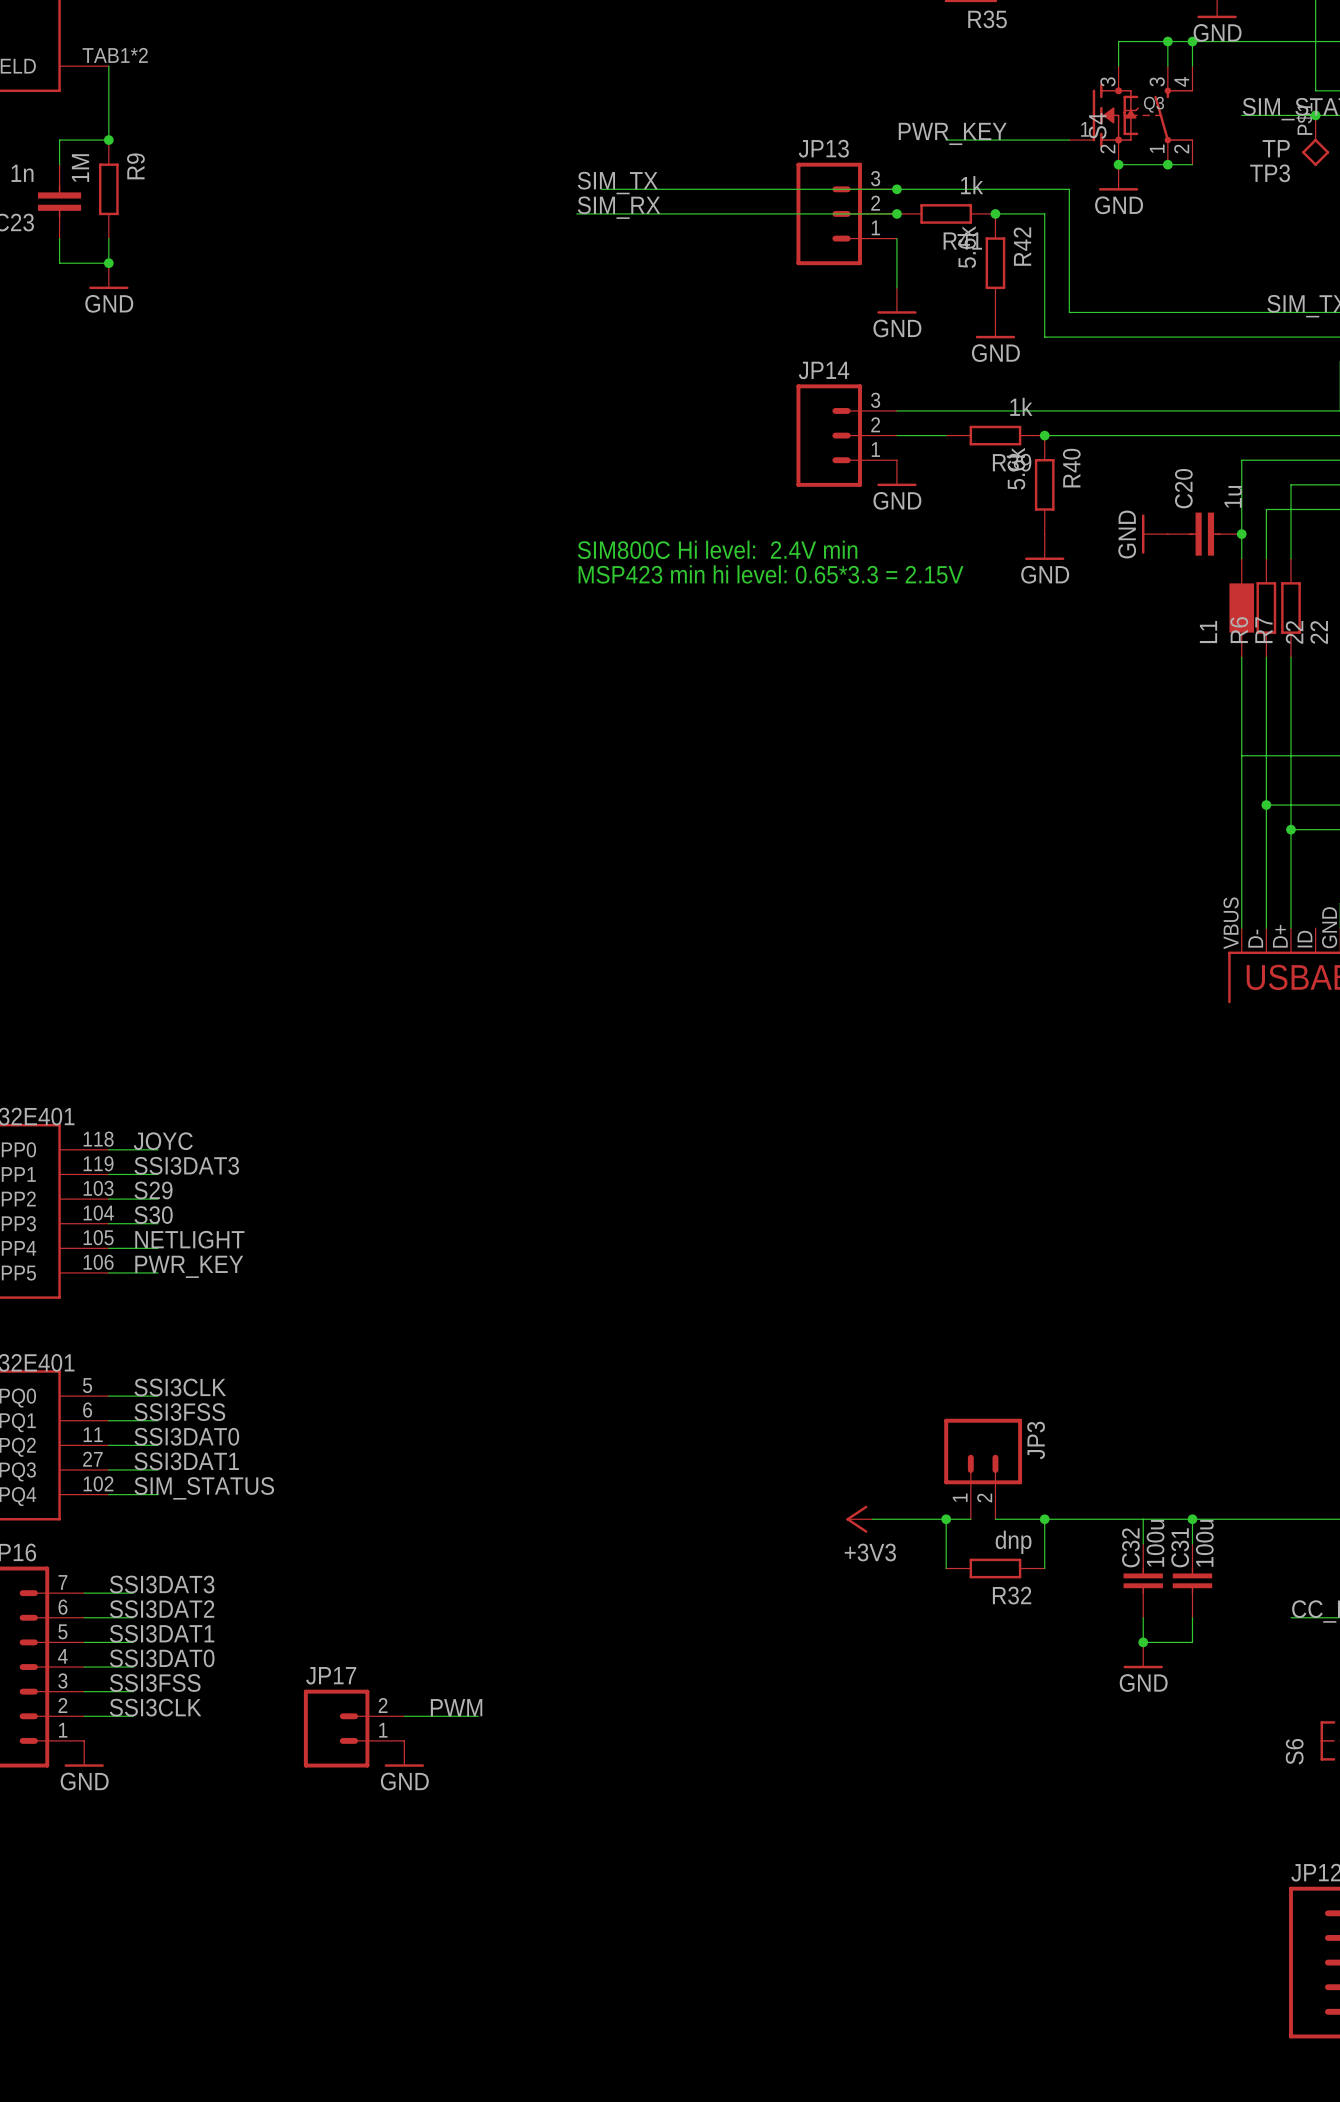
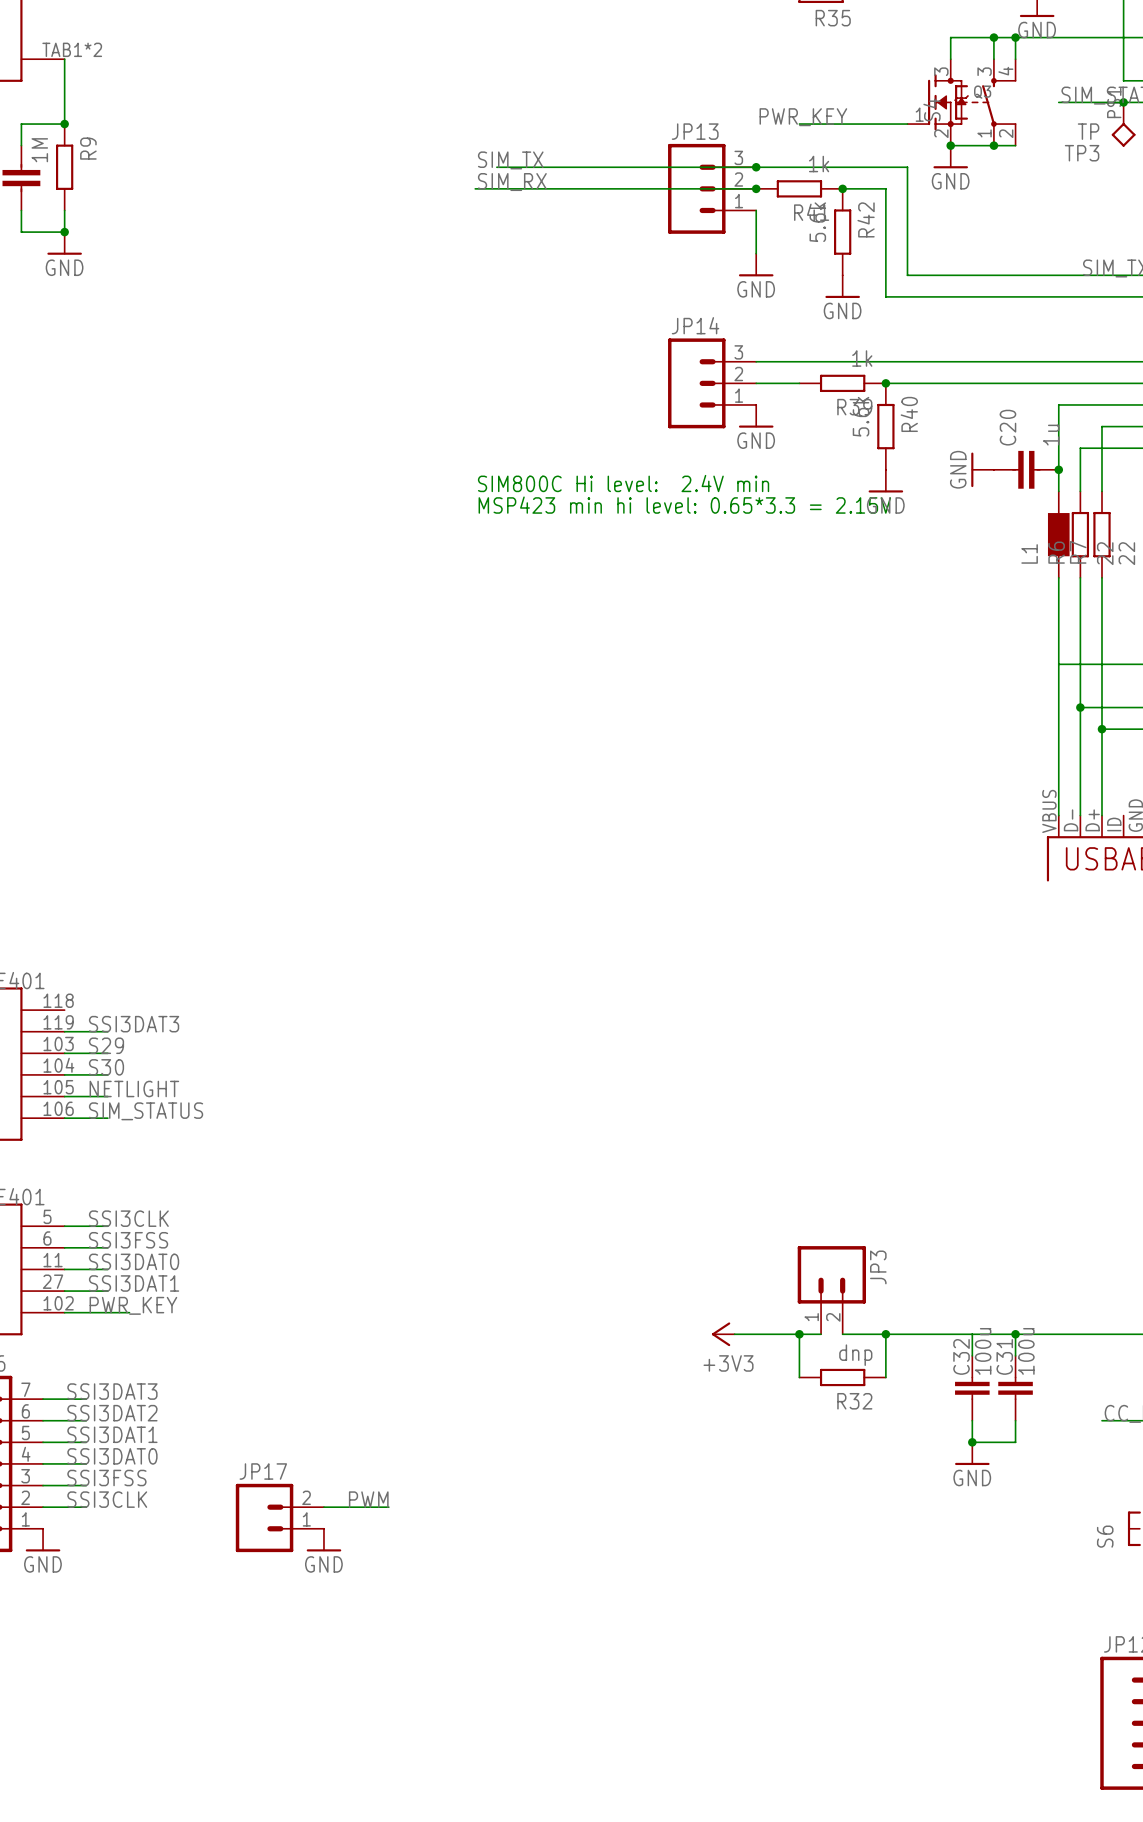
label: JOYC (163, 1141) -> none
wire: (108, 1149) (158, 1149) -> none
label: PWR_KEY (189, 1266) -> SIM_STATUS (146, 1111)
label: SIM_STATUS (204, 1488) -> PWR_KEY (133, 1305)
wire: none -> (107, 1312) (129, 1312)

